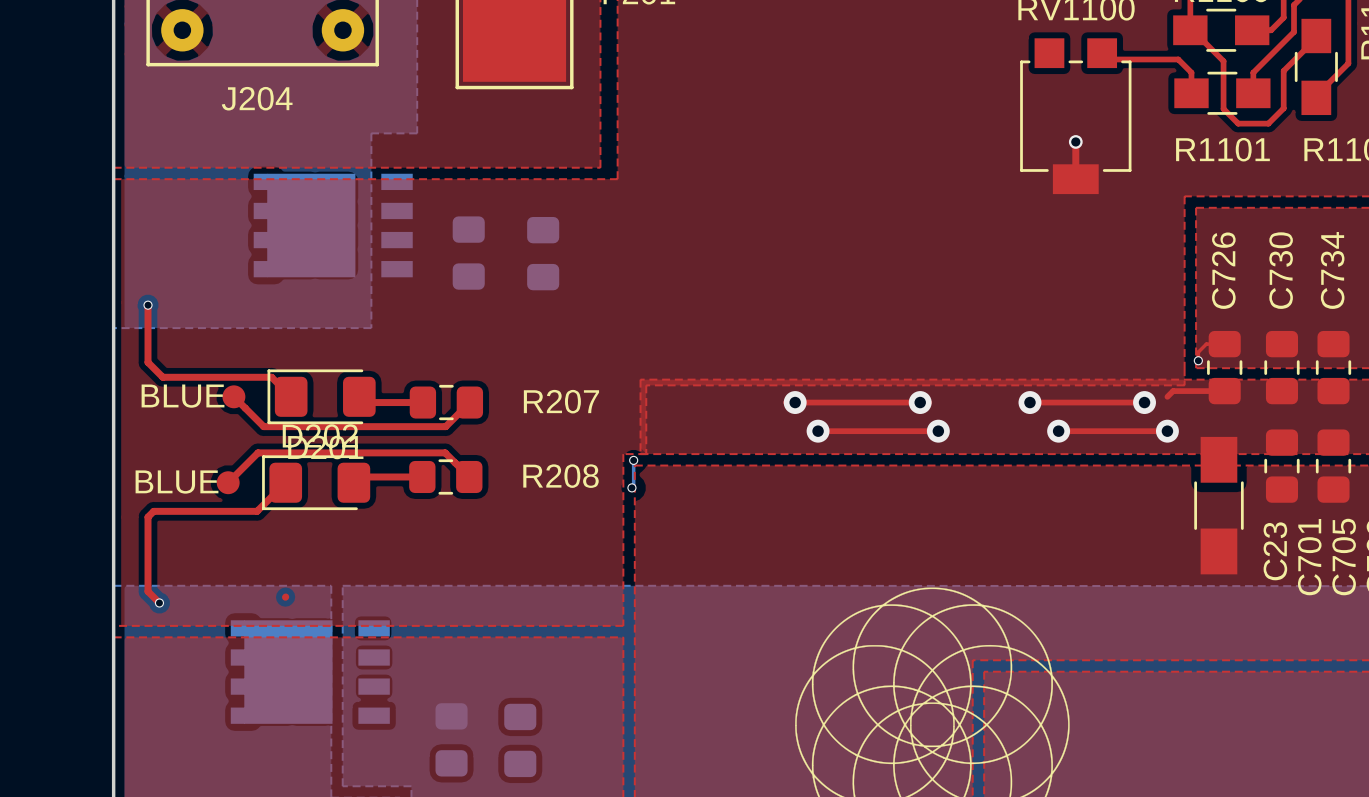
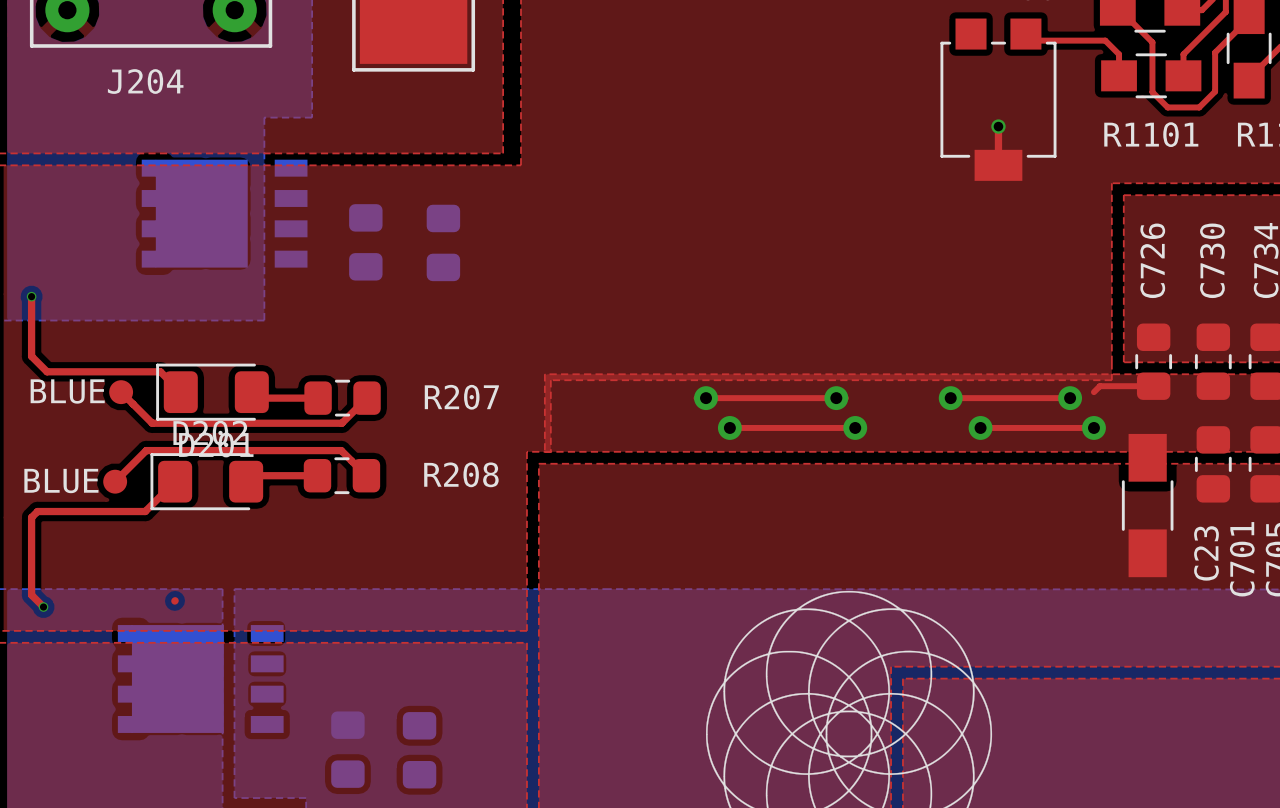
top track: (1224, 344) (1206, 344) (1198, 352) (1198, 360) -> none
via: (1198, 360) -> none
bottom track: (633, 460) (633, 486) (631, 487) -> none
via: (633, 460) -> none
via: (631, 487) -> none

